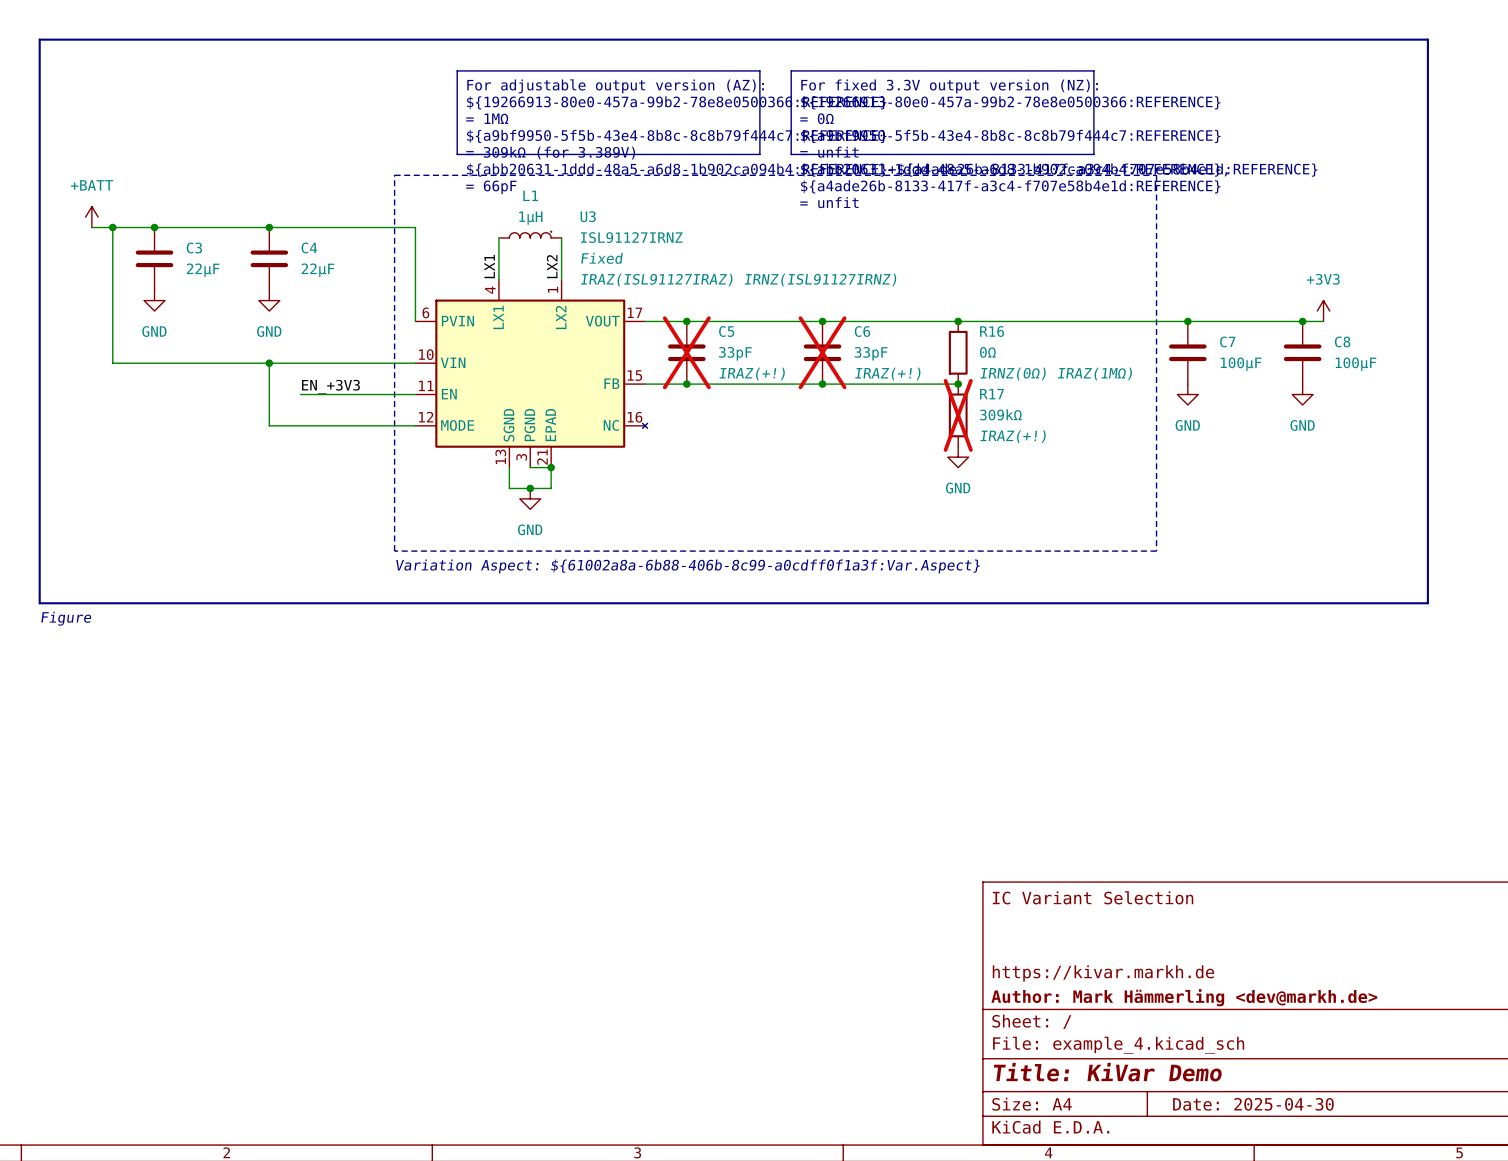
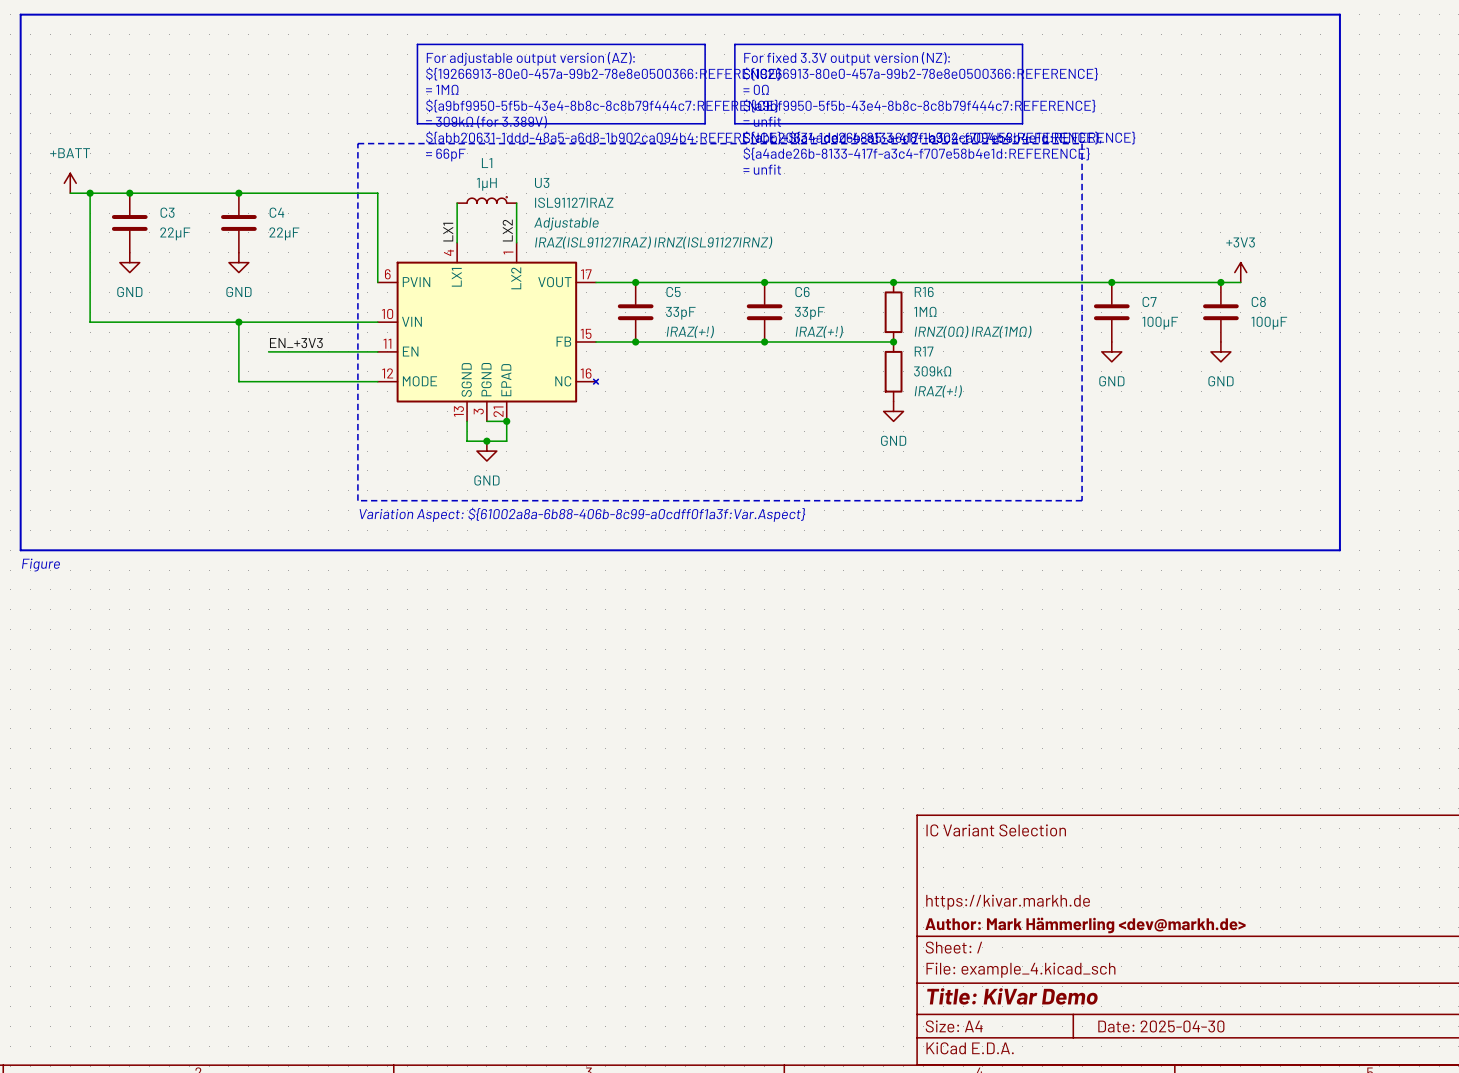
U3 value: ISL91127IRNZ (631, 237) -> ISL91127IRAZ (574, 202)
U3 text: Fixed (601, 258) -> Adjustable (566, 223)
C5 do-not-place cross: (686, 352) -> none
C6 do-not-place cross: (822, 352) -> none
R16 value: 0Ω (987, 352) -> 1MΩ (925, 311)
R17 do-not-place cross: (958, 415) -> none

